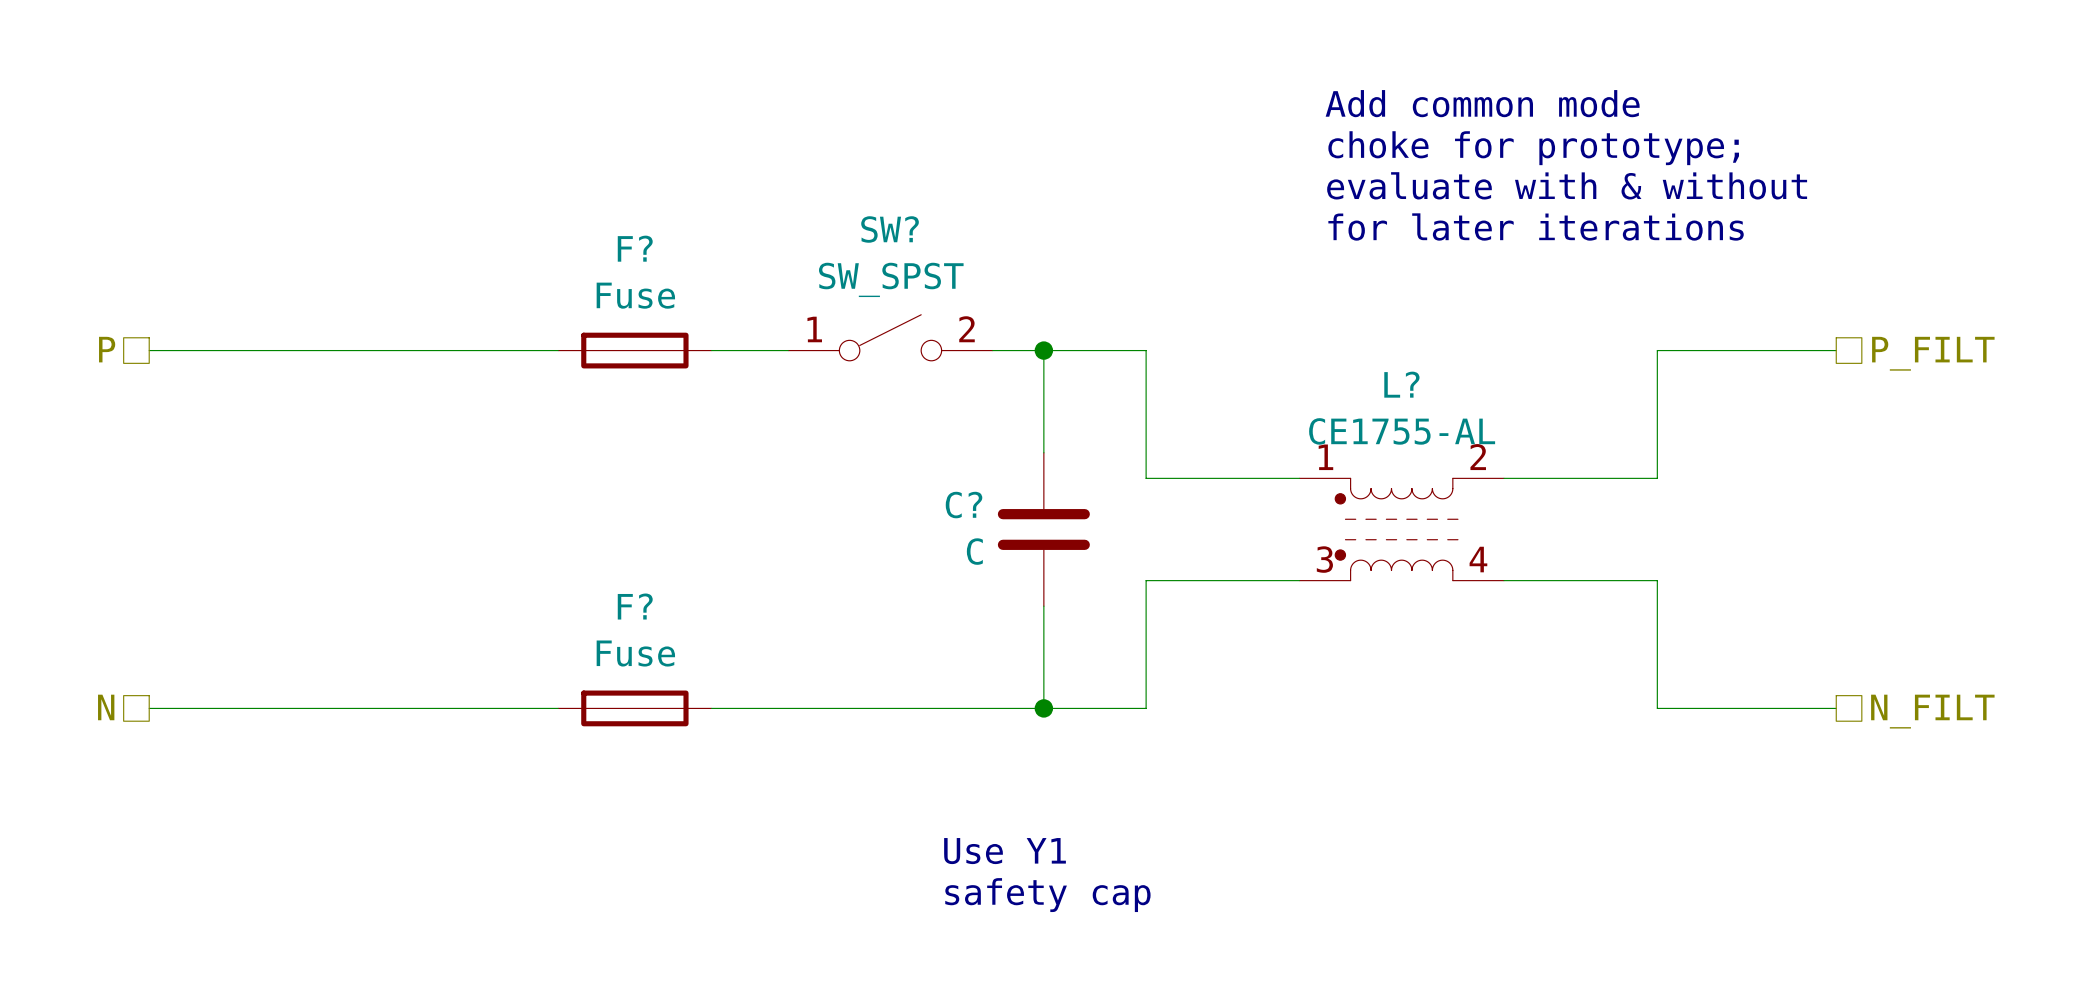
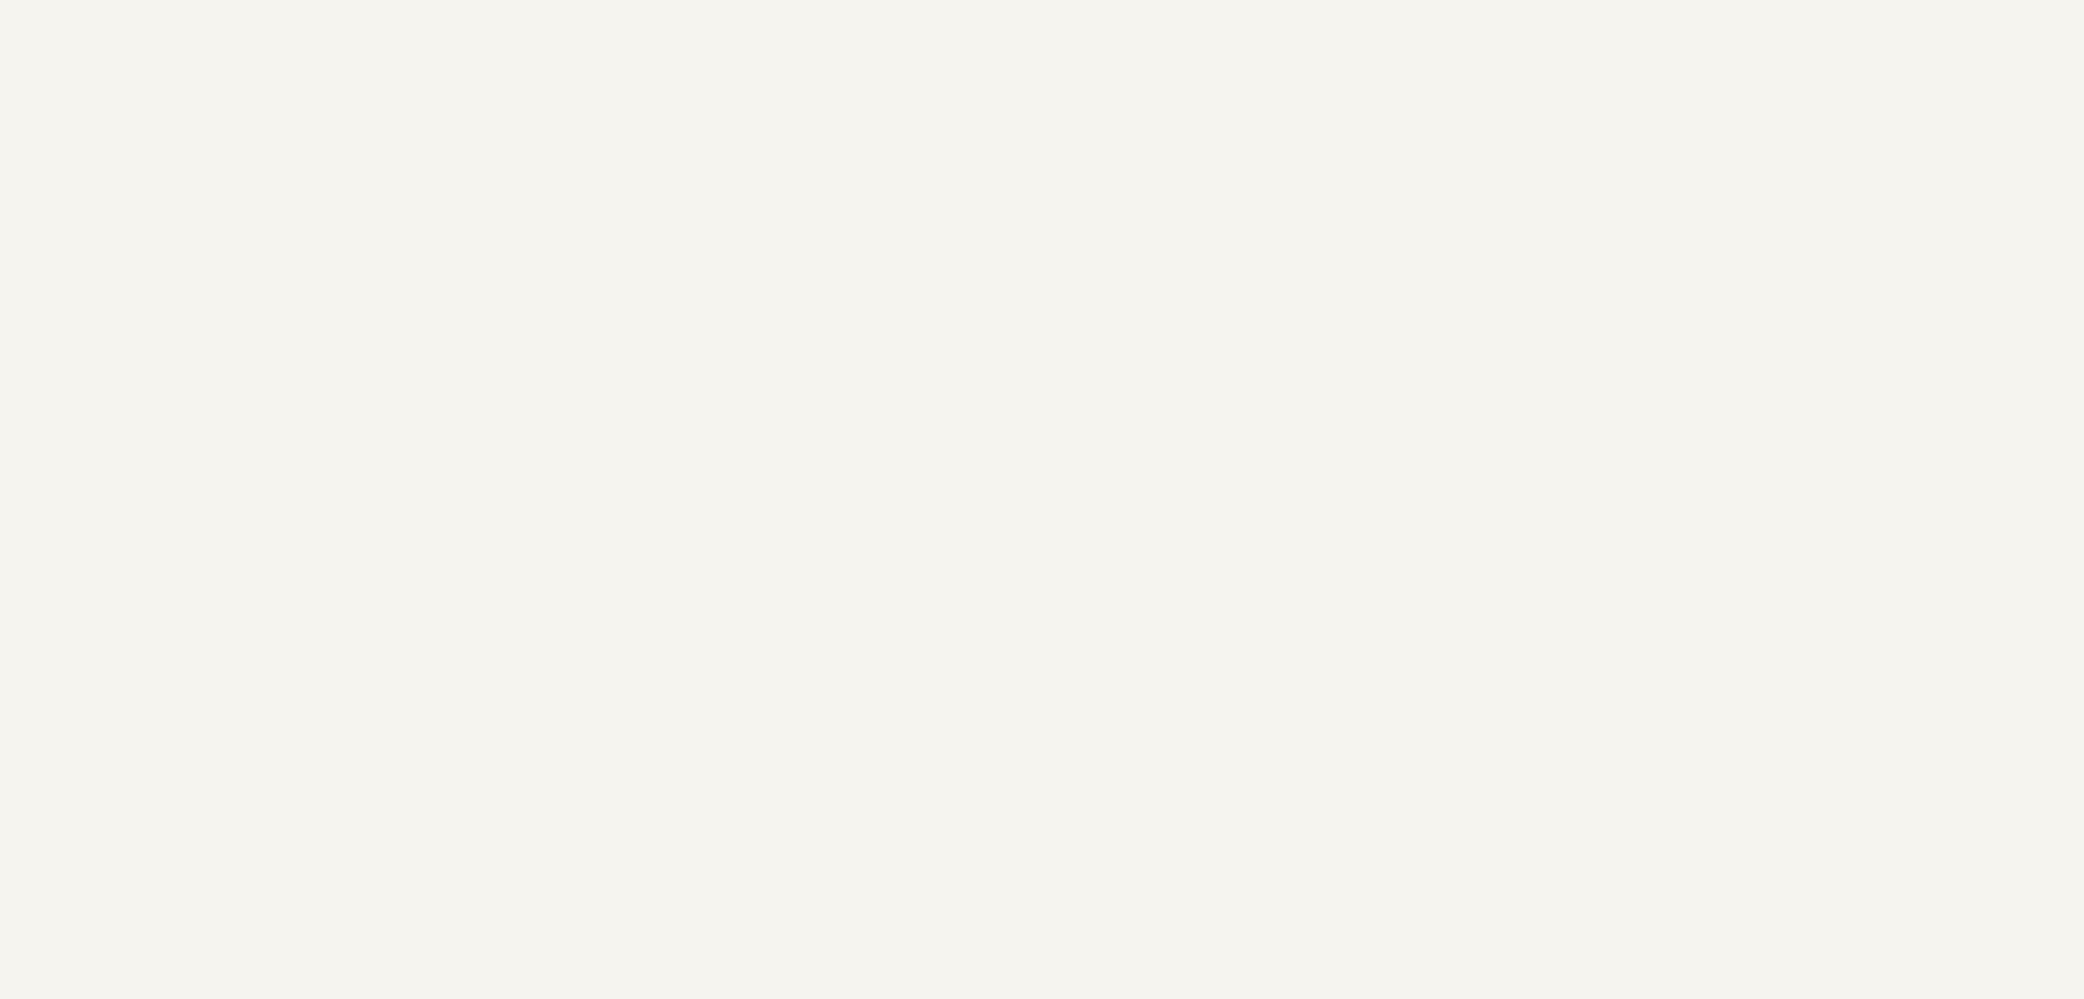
text: Add common mode (1482, 103) -> none
text: choke for prototype; (1533, 148) -> none
text: evaluate with & without (1567, 185) -> none
text: for later iterations (1536, 226) -> none
SW?: SW_SPST (890, 337) -> none
hierarchical label: P (107, 349) -> none
wire: (149, 350) (558, 350) -> none
F?: Fuse (634, 350) -> none
wire: (711, 350) (788, 350) -> none
wire: (992, 350) (1146, 350) (1146, 478) (1299, 478) -> none
wire: (1043, 350) (1043, 452) -> none
junction: (1043, 350) -> none
wire: (1836, 350) (1657, 350) (1657, 478) (1503, 478) -> none
hierarchical label: P_FILT (1933, 353) -> none
C?: C (1043, 529) -> none
L?: CE1755-AL (1401, 529) -> none
wire: (1299, 580) (1146, 580) (1146, 708) (711, 708) -> none
wire: (1503, 580) (1657, 580) (1657, 708) (1836, 708) -> none
wire: (1043, 606) (1043, 708) -> none
hierarchical label: N (106, 707) -> none
wire: (149, 708) (558, 708) -> none
F?: Fuse (634, 708) -> none
junction: (1043, 708) -> none
hierarchical label: N_FILT (1932, 711) -> none
text: Use Y1 (1005, 851) -> none
text: safety cap (1047, 895) -> none

